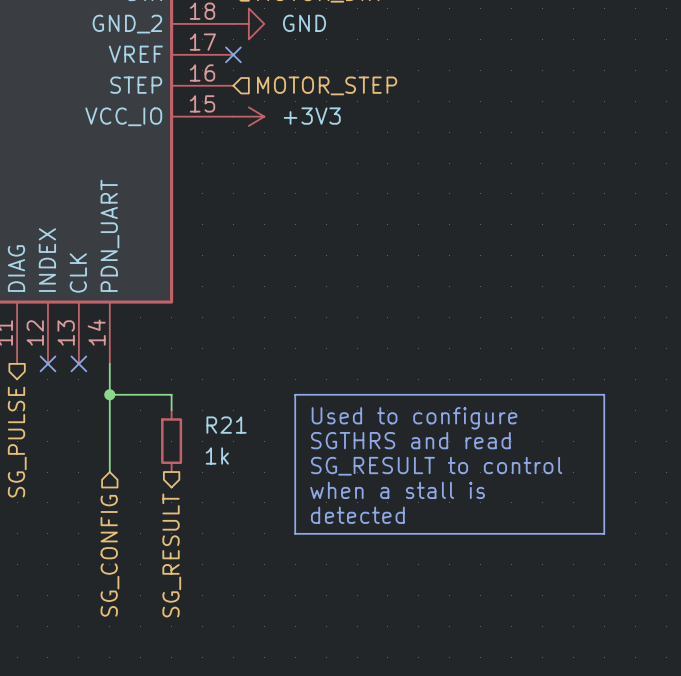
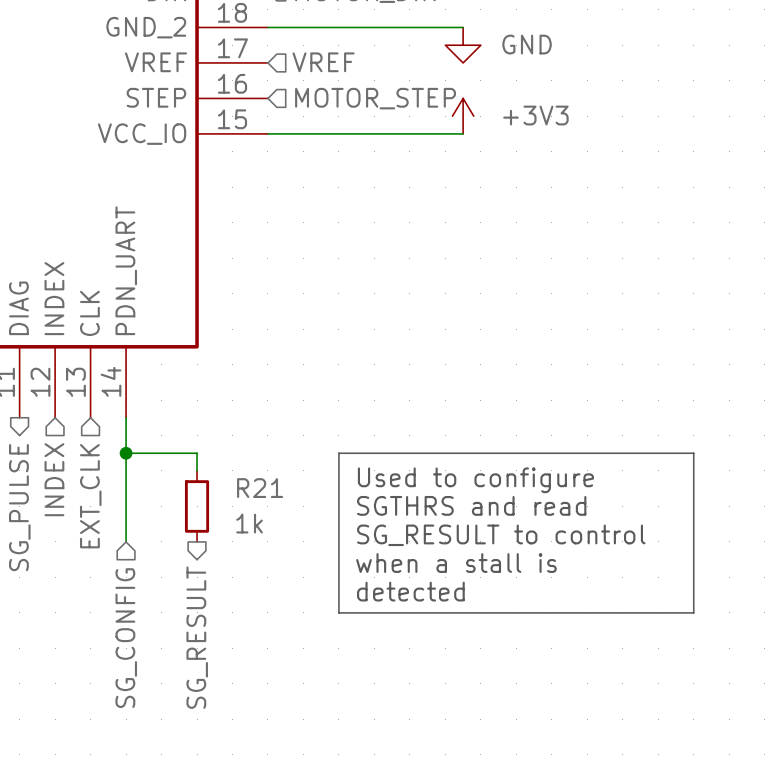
wire: none -> (267, 27) (463, 27)
power symbol: GND (248, 23) -> none
power symbol: none -> GND (463, 45)
no-connect mark: (233, 54) -> none
hierarchical label: none -> VREF (323, 62)
wire: none -> (267, 133) (463, 133)
power symbol rotation: 0° (248, 116) -> 90° counterclockwise (463, 116)
power symbol position: +3V3 (248, 116) -> +3V3 (463, 116)
no-connect mark: (47, 363) -> none
no-connect mark: (78, 363) -> none
hierarchical label: none -> INDEX (54, 479)
hierarchical label: none -> EXT_CLK (90, 496)

